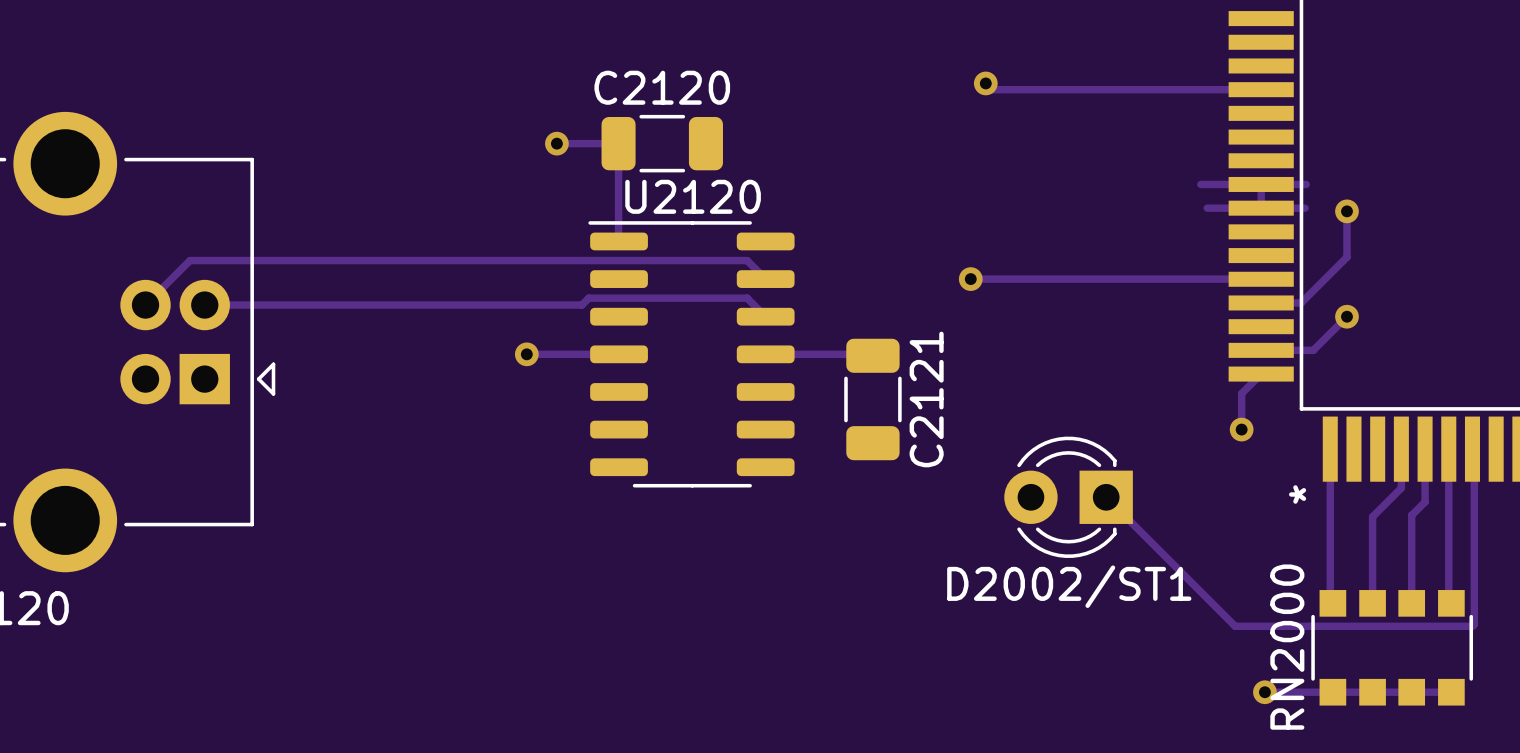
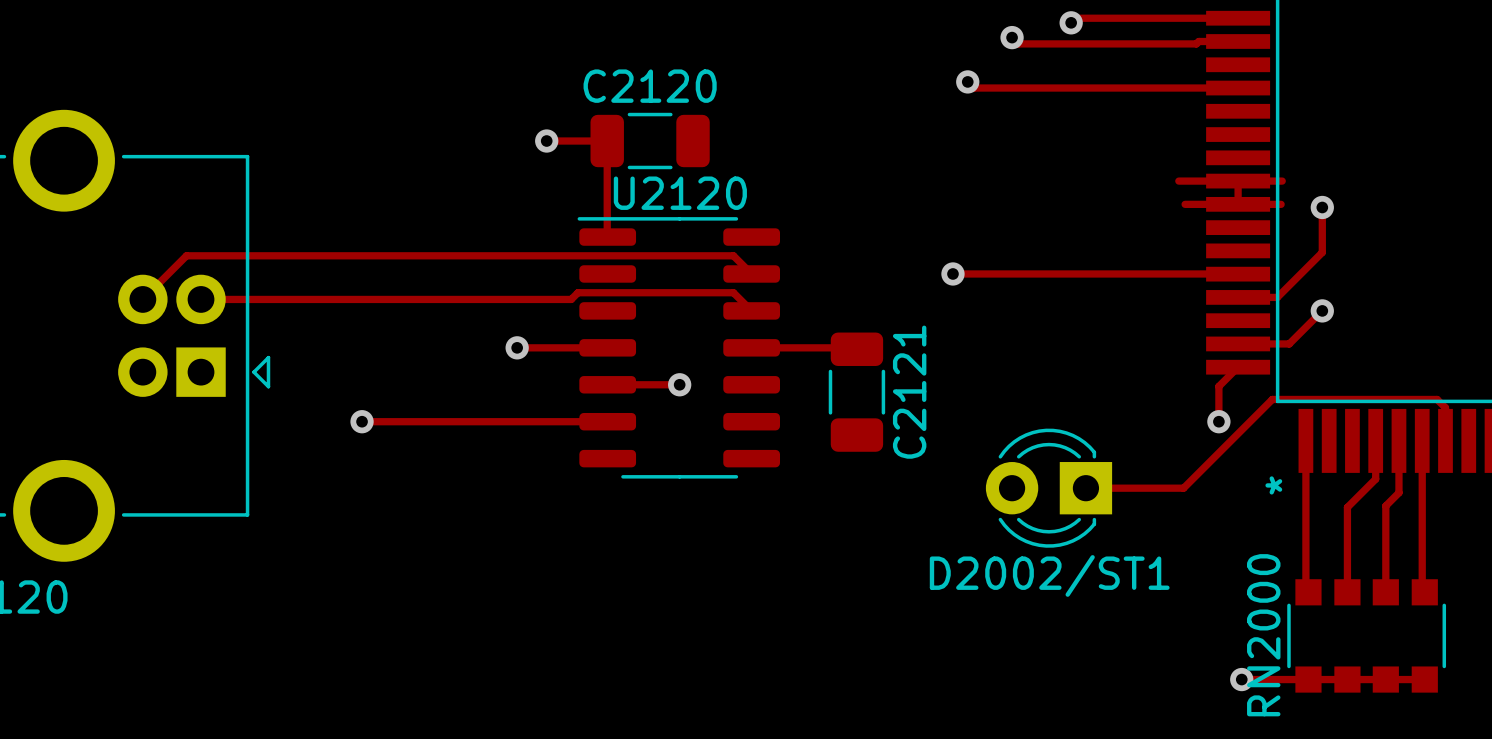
track: none -> (1238, 18) (1075, 18) (1071, 22)
via: none -> (1071, 22)
track: none -> (1012, 37) (1018, 43) (1196, 43) (1198, 41) (1238, 41)
via: none -> (1012, 37)
track: none -> (607, 384) (679, 384)
via: none -> (679, 384)
track: none -> (362, 421) (607, 421)
via: none -> (362, 421)
track: (1474, 451) (1474, 624) (1472, 626) (1235, 626) (1106, 497) -> (1445, 440) (1445, 407) (1437, 399) (1272, 399) (1183, 488) (1085, 488)

